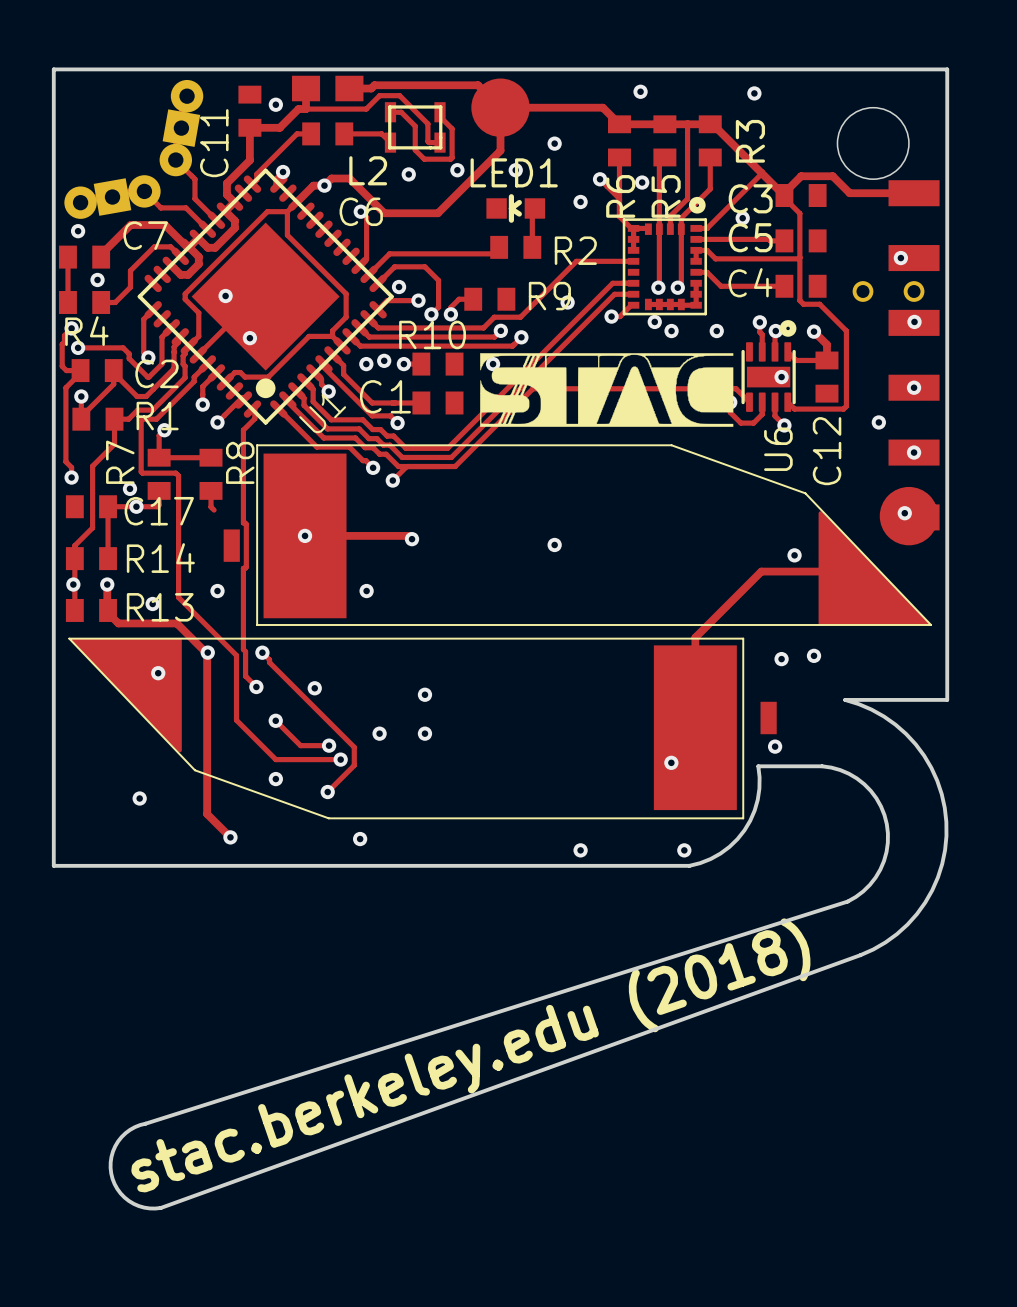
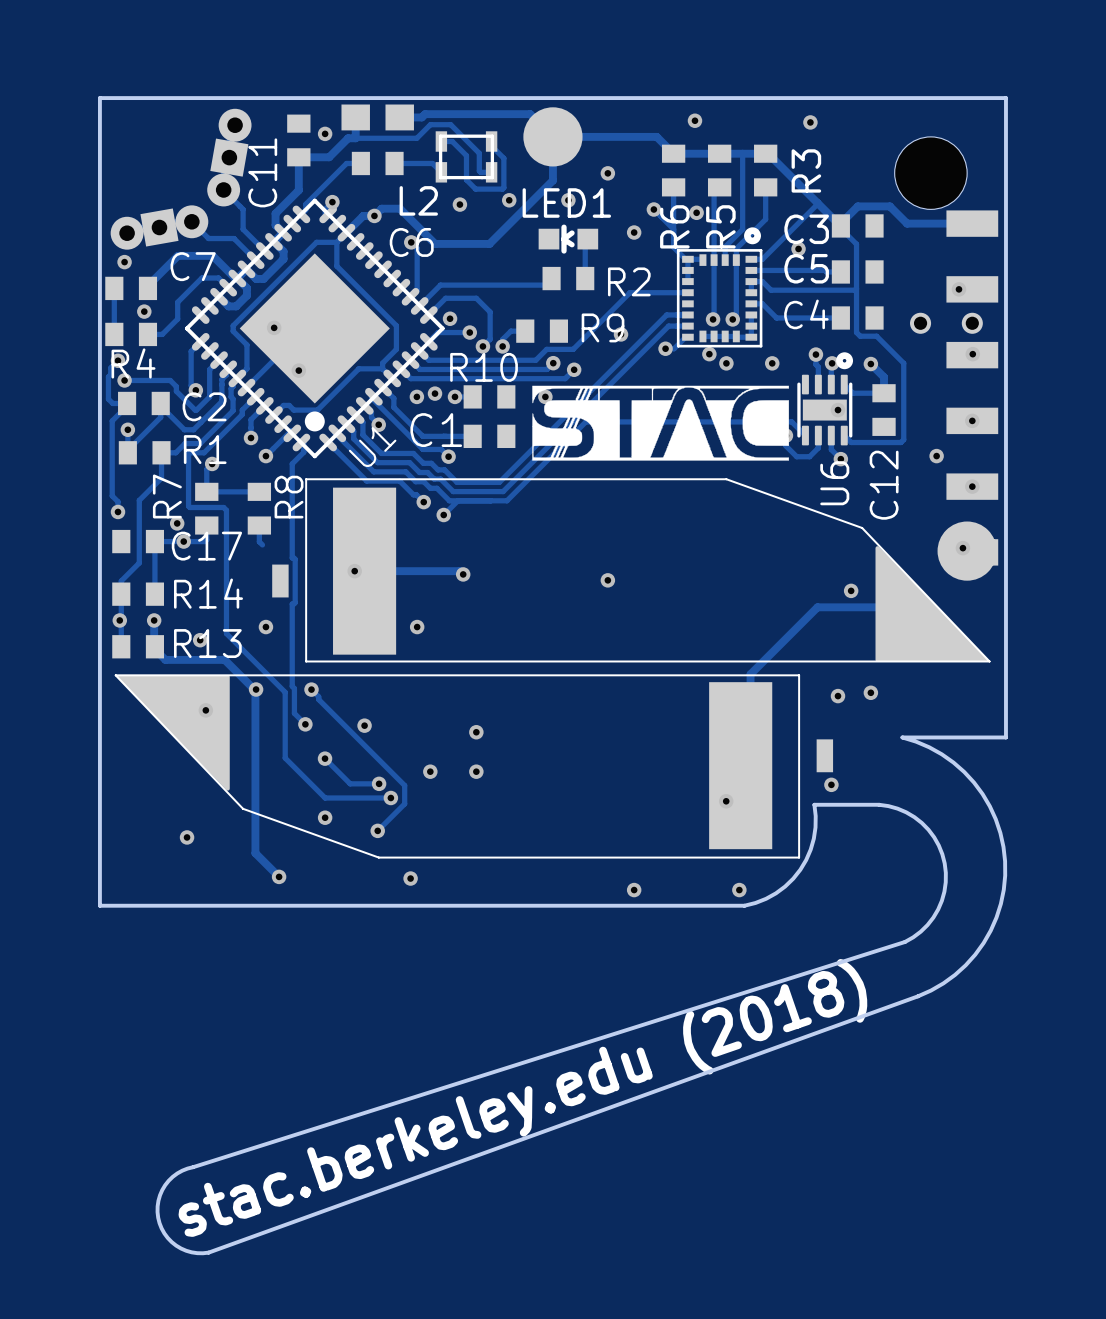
part footprint: [223, 444, 933, 626] -> [272, 478, 991, 663]
part footprint: [68, 637, 777, 820] -> [114, 674, 834, 859]

